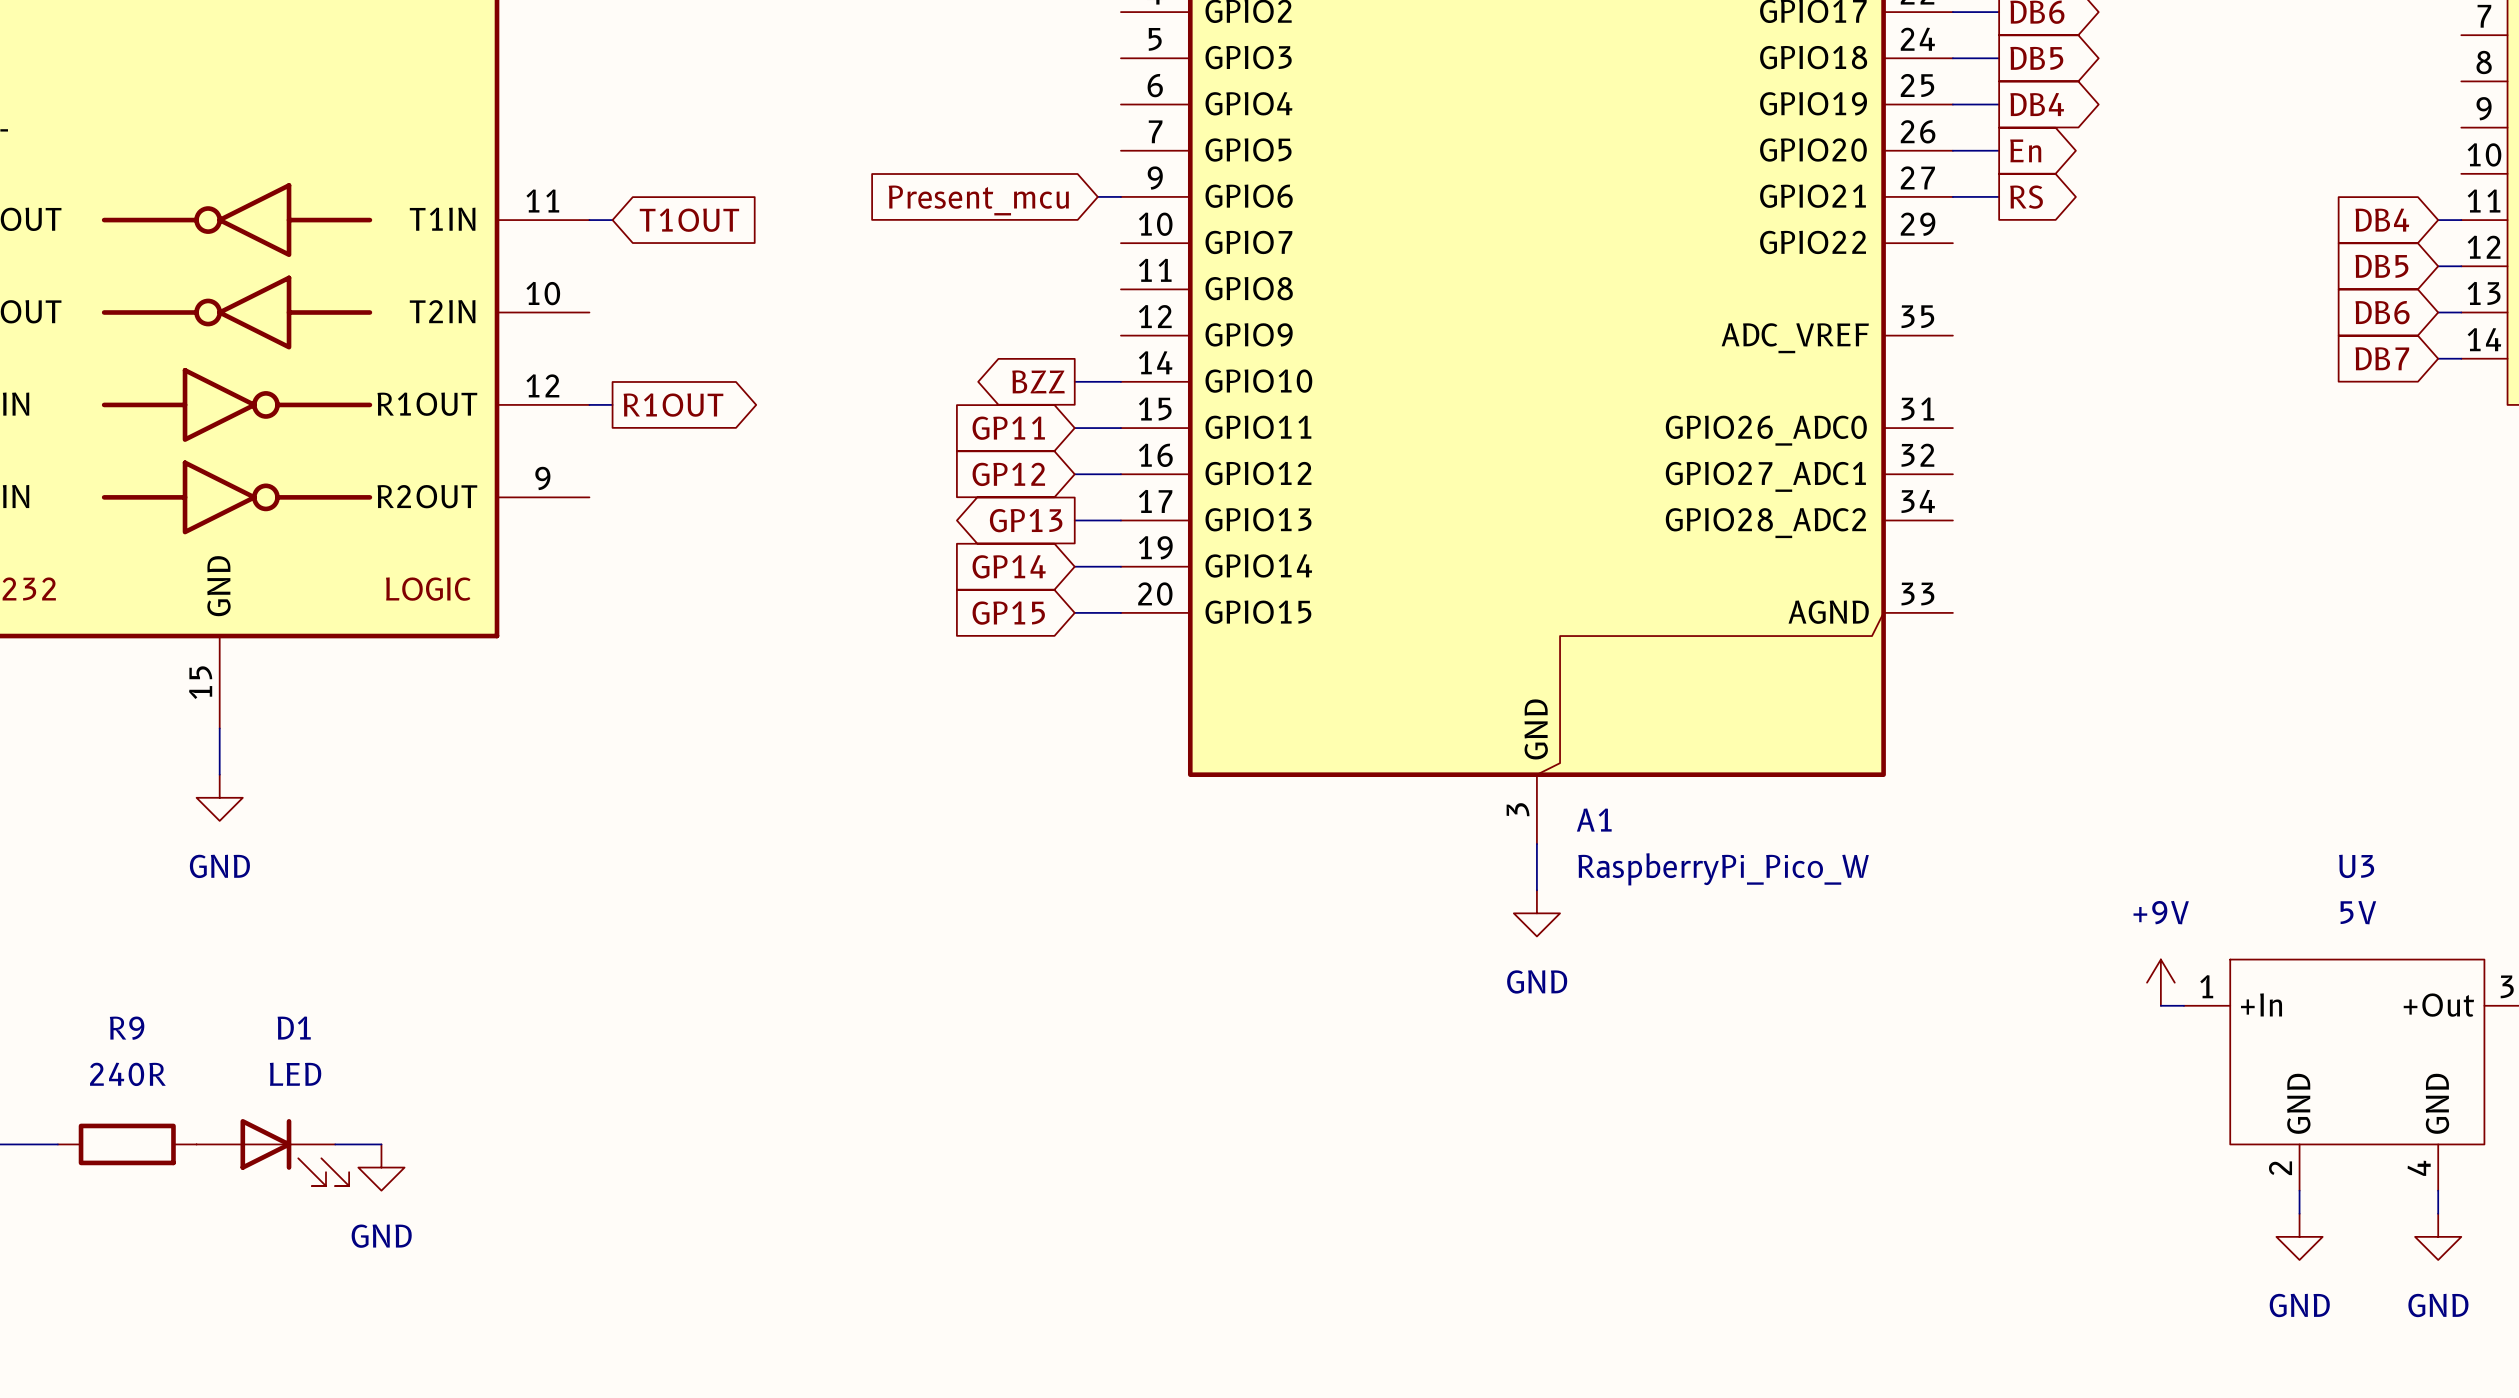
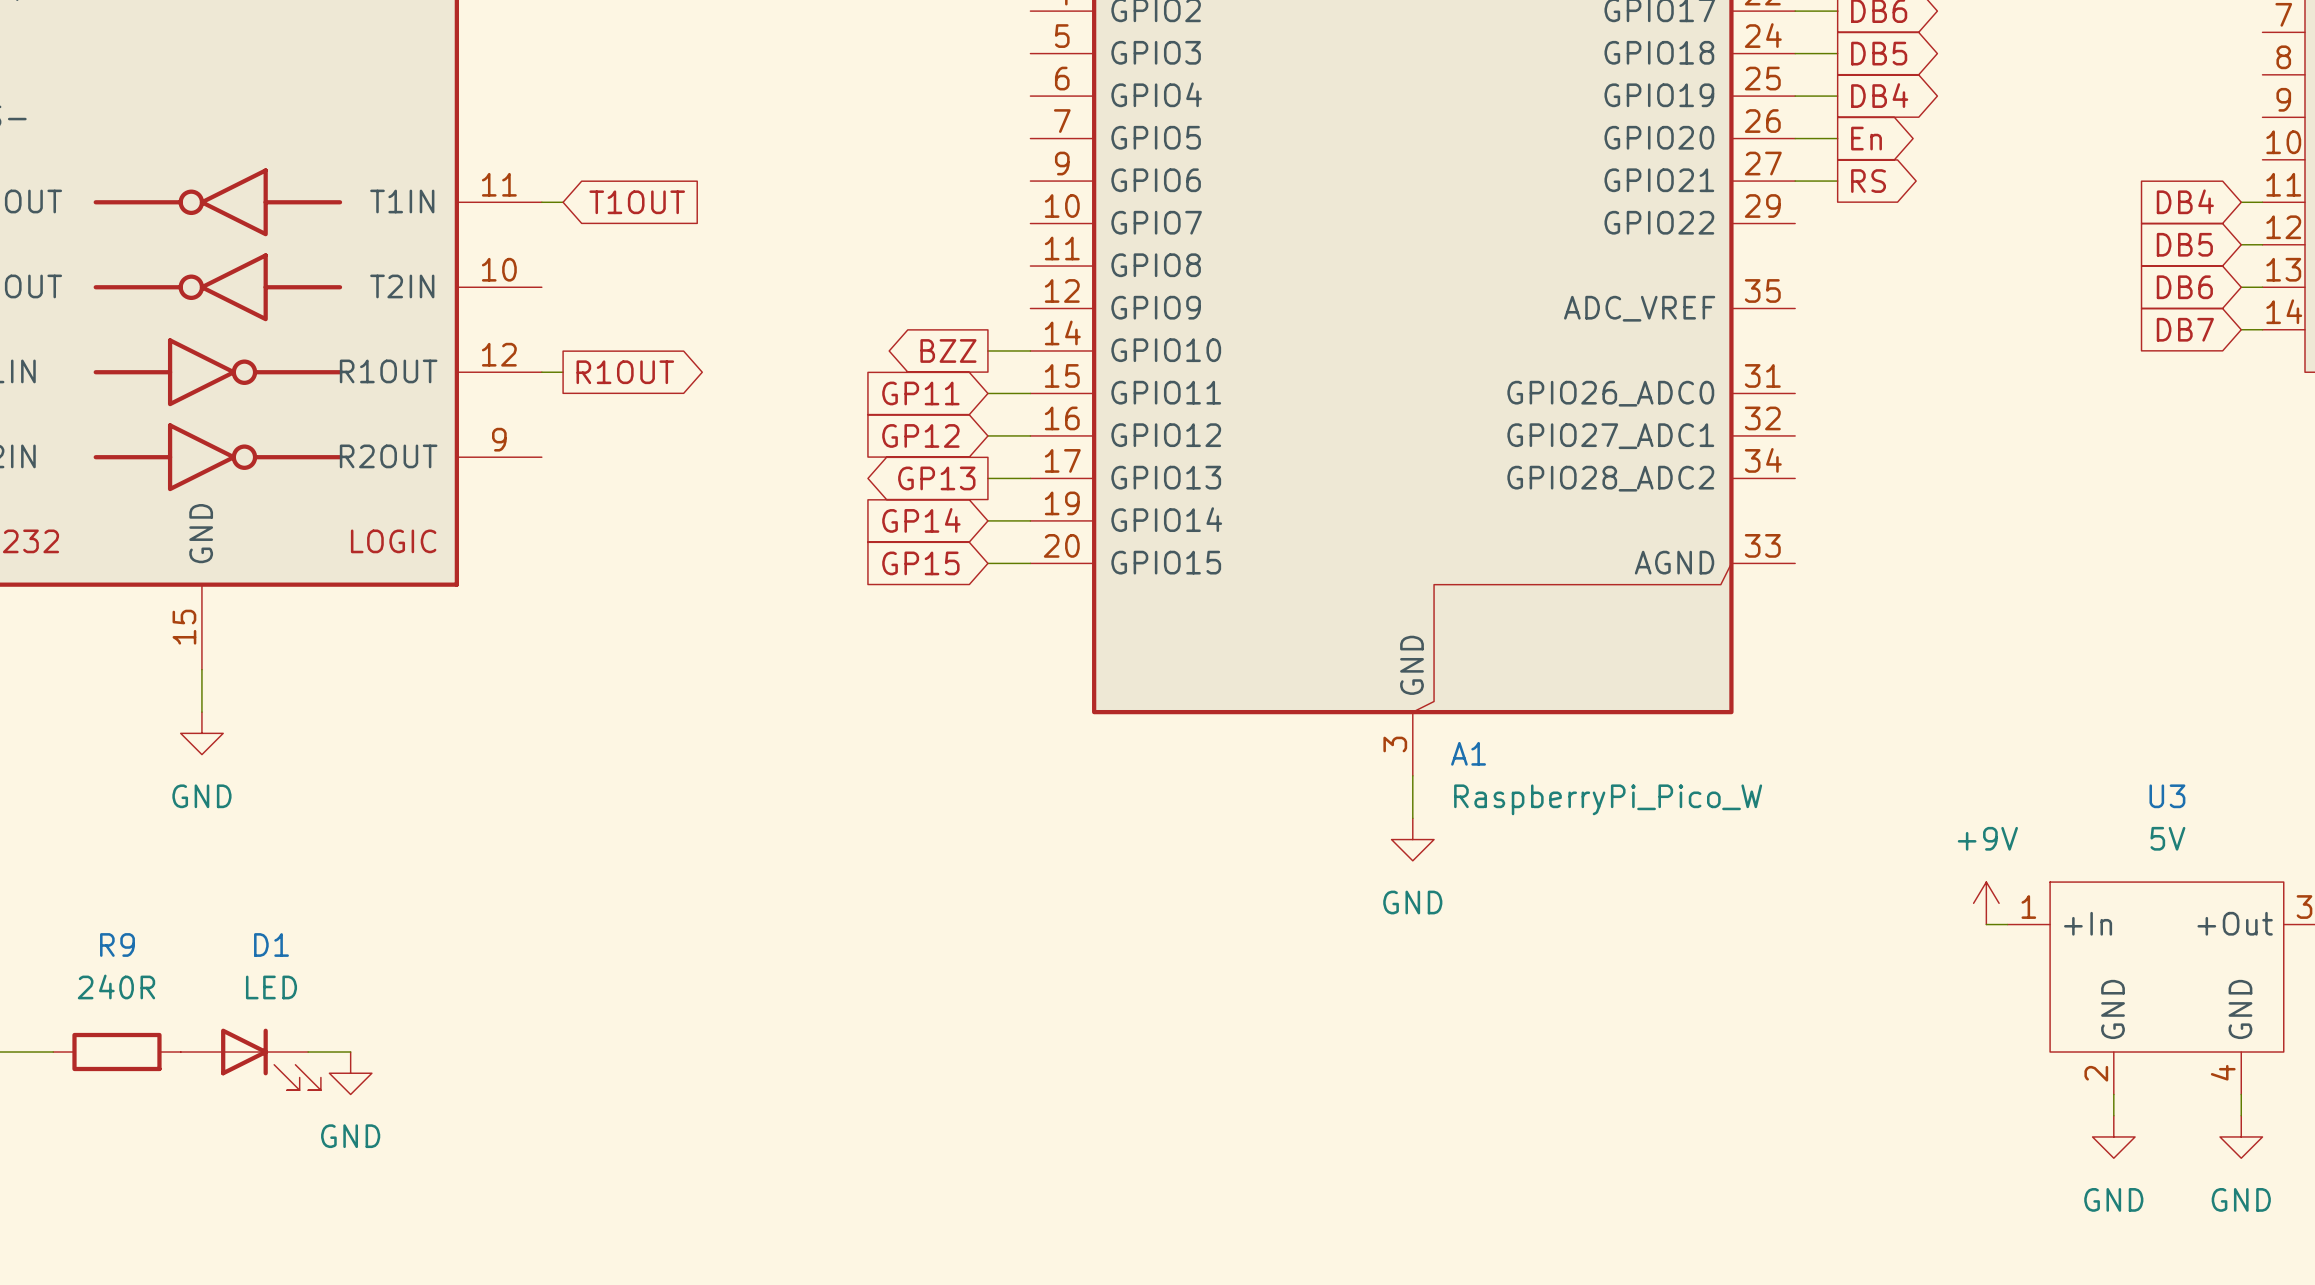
wire: (1097, 196) (1120, 196) -> none
global label: Present_mcu (978, 200) -> none

